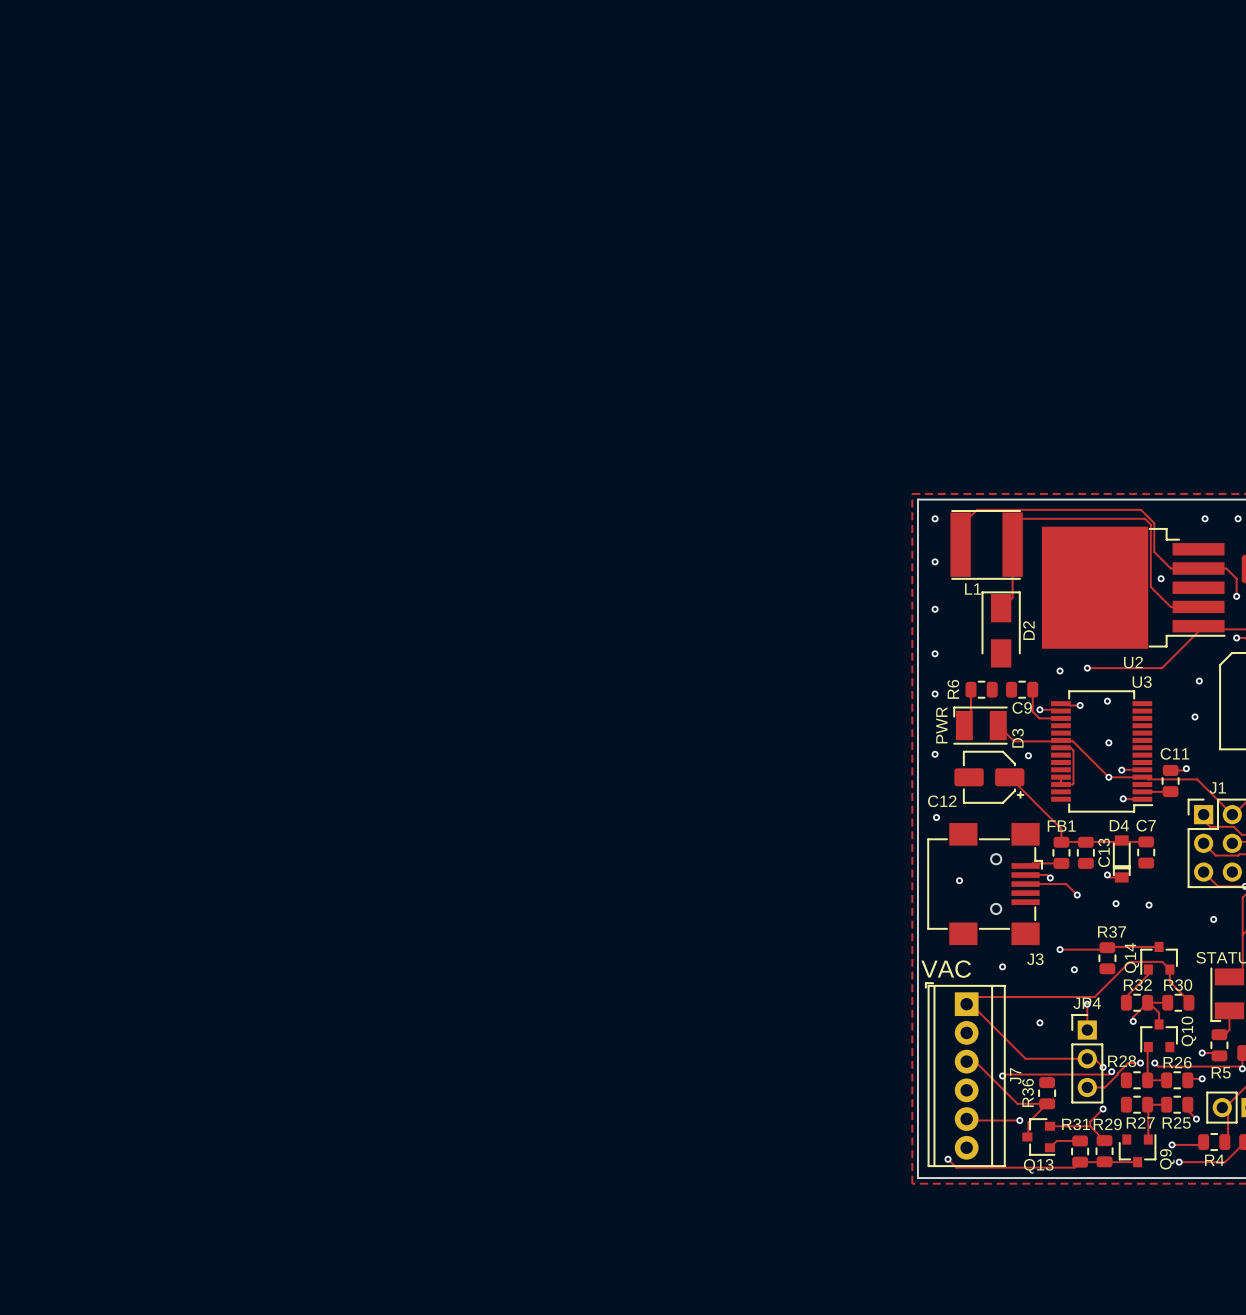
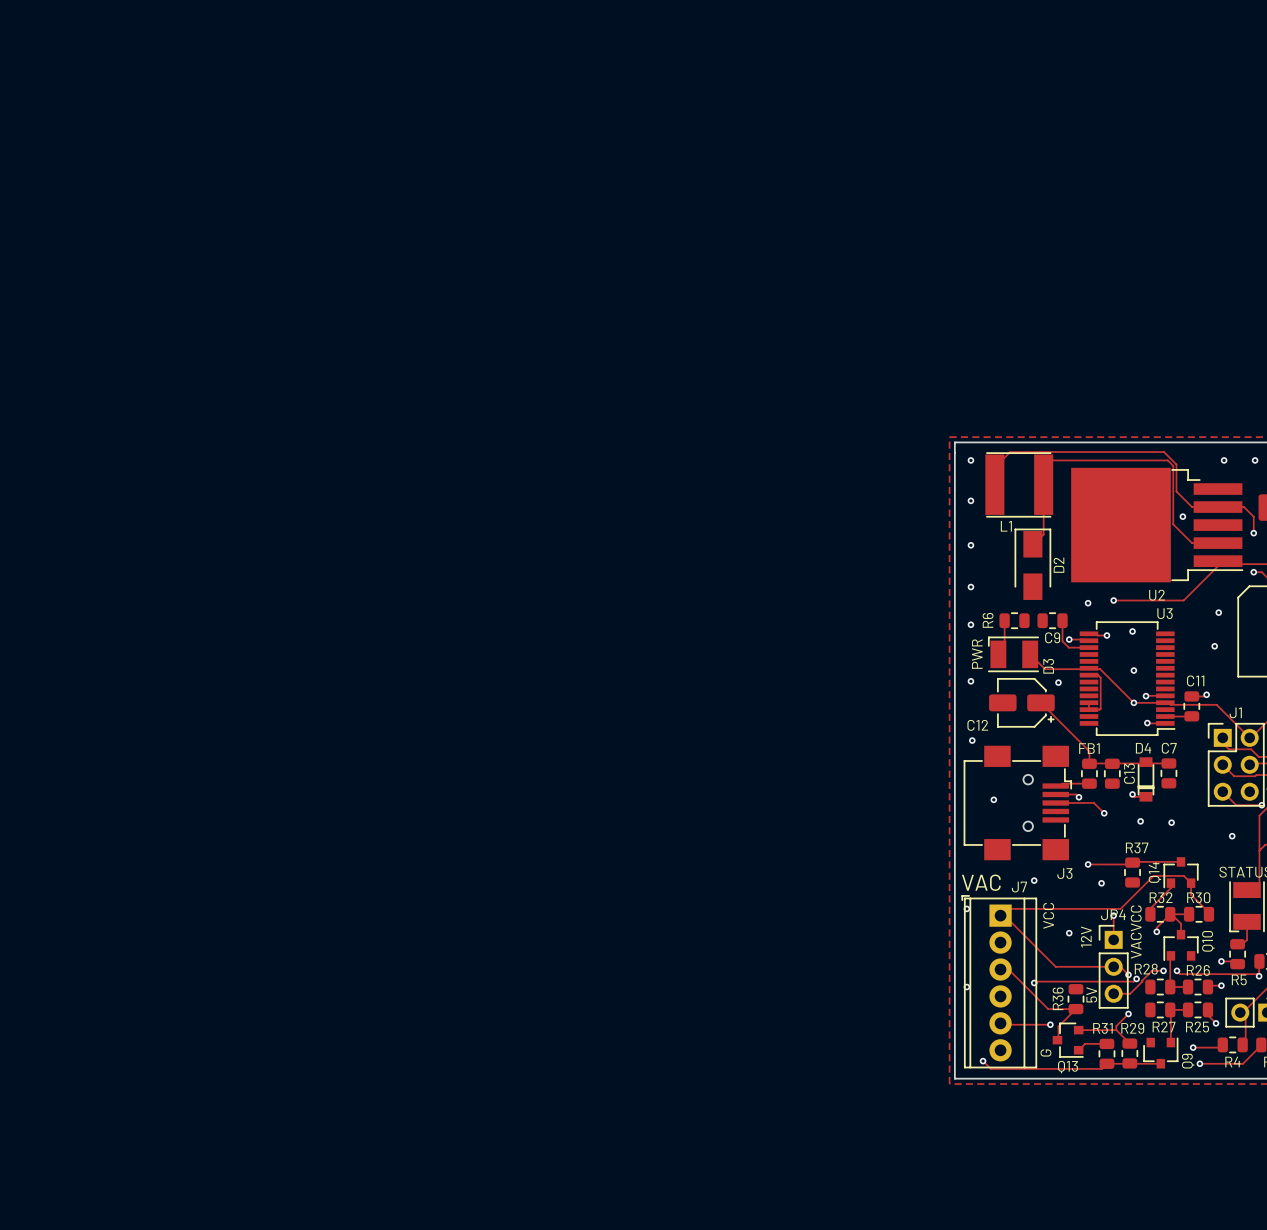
via: none -> (966, 908)
text: none -> VCC (1048, 915)
text: none -> VACVCC (1136, 932)
text: none -> 12V (1086, 937)
J7 name rotation: 0° (1015, 1076) -> 90° clockwise (1019, 887)
J7 name position: J7 (1015, 1076) -> J7 (1019, 887)
via: none -> (966, 987)
text: none -> 5V (1091, 994)
text: none -> G (1045, 1053)

